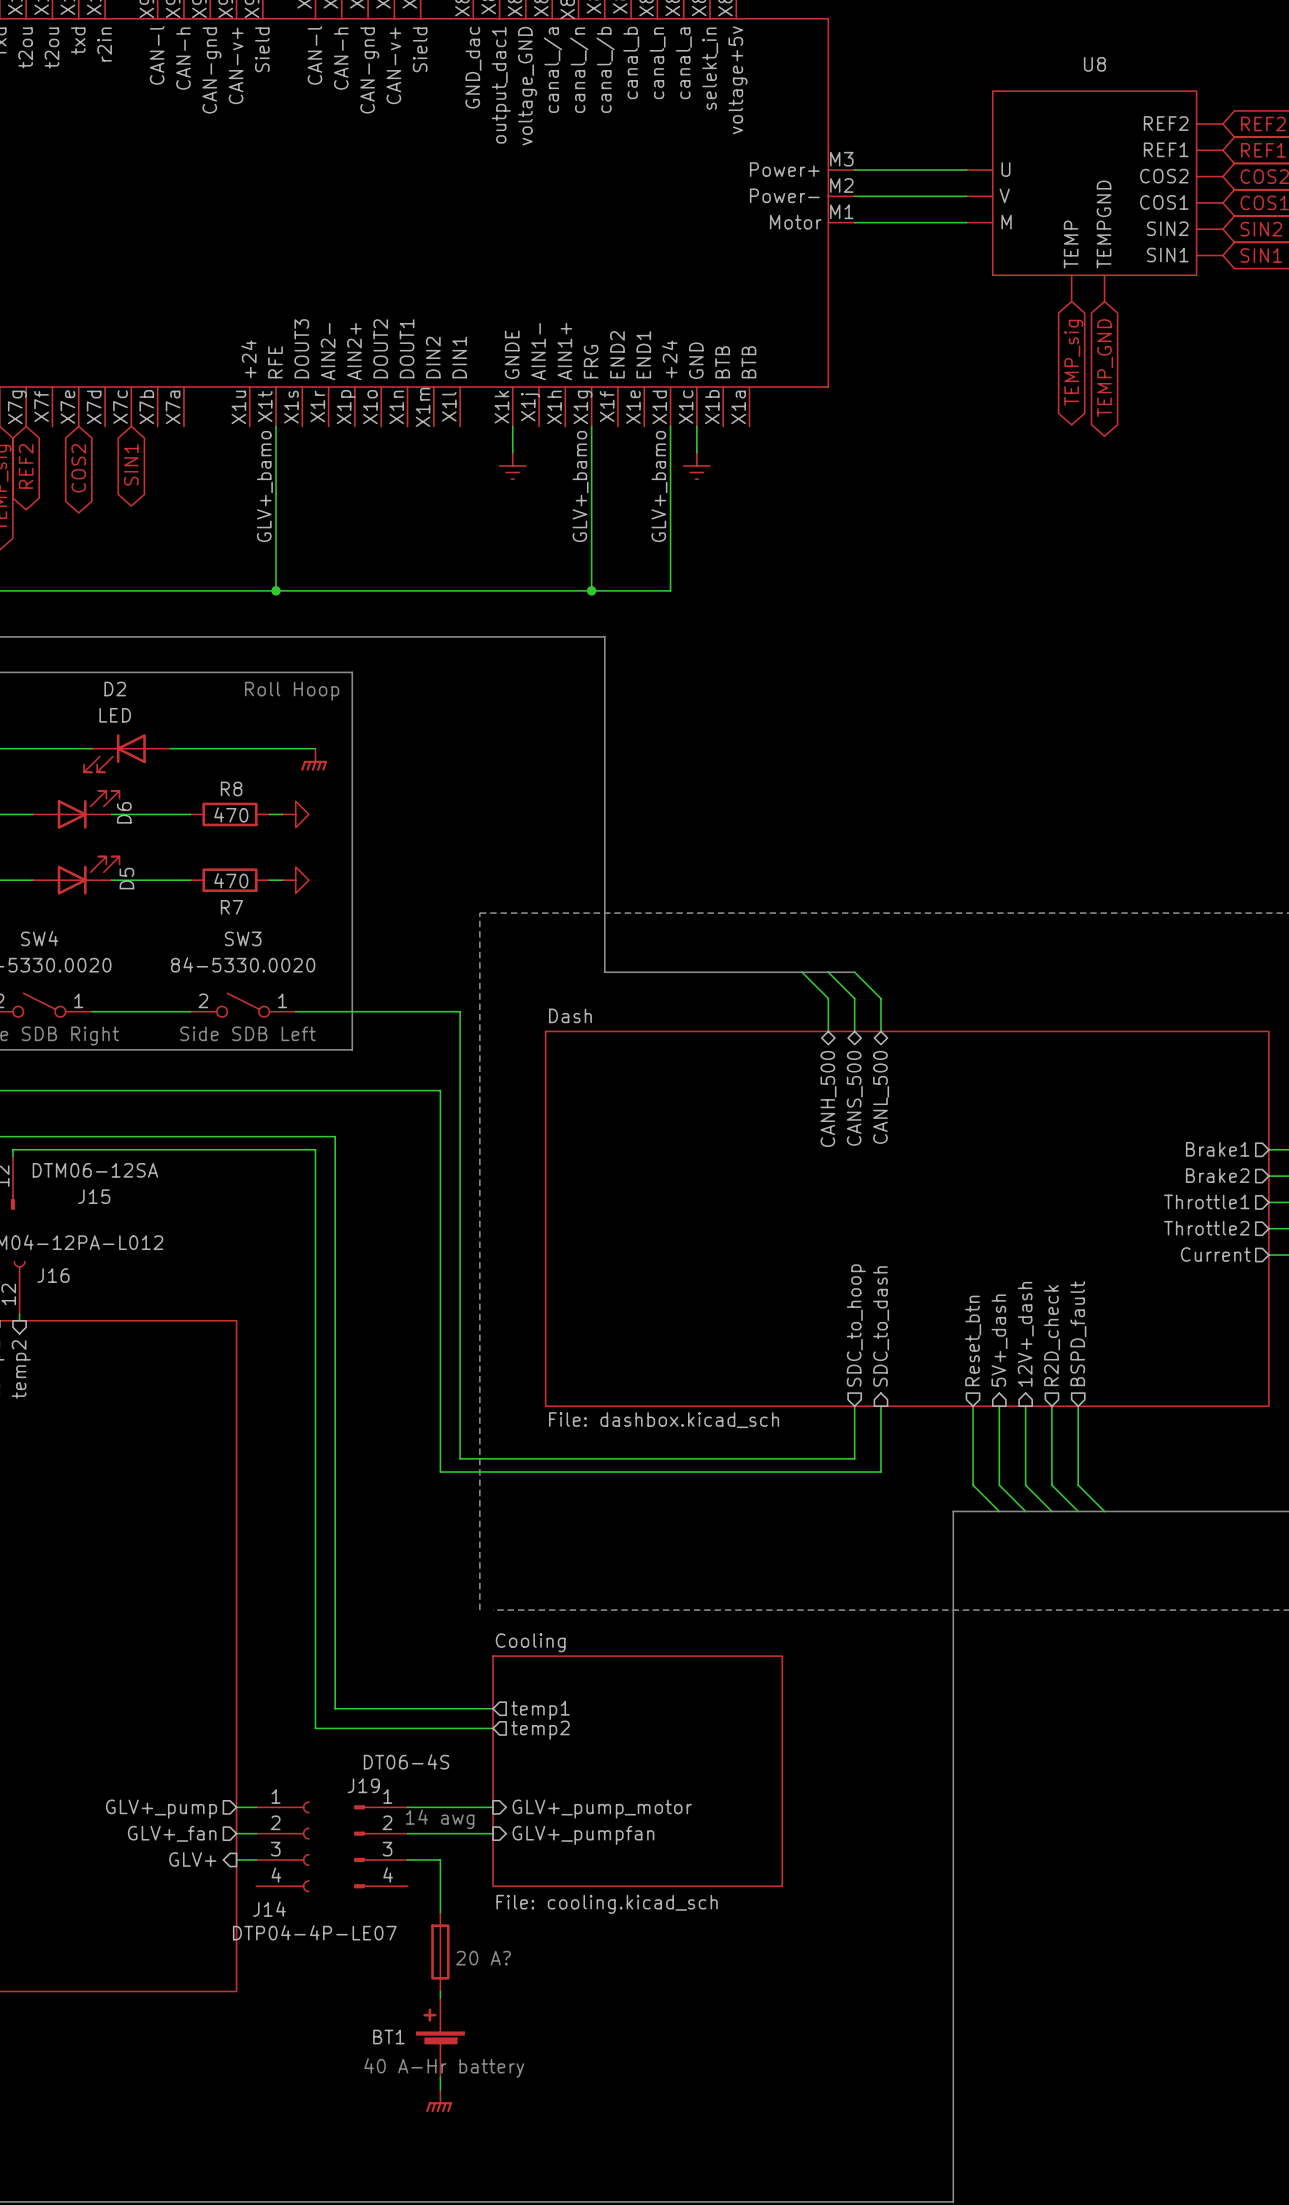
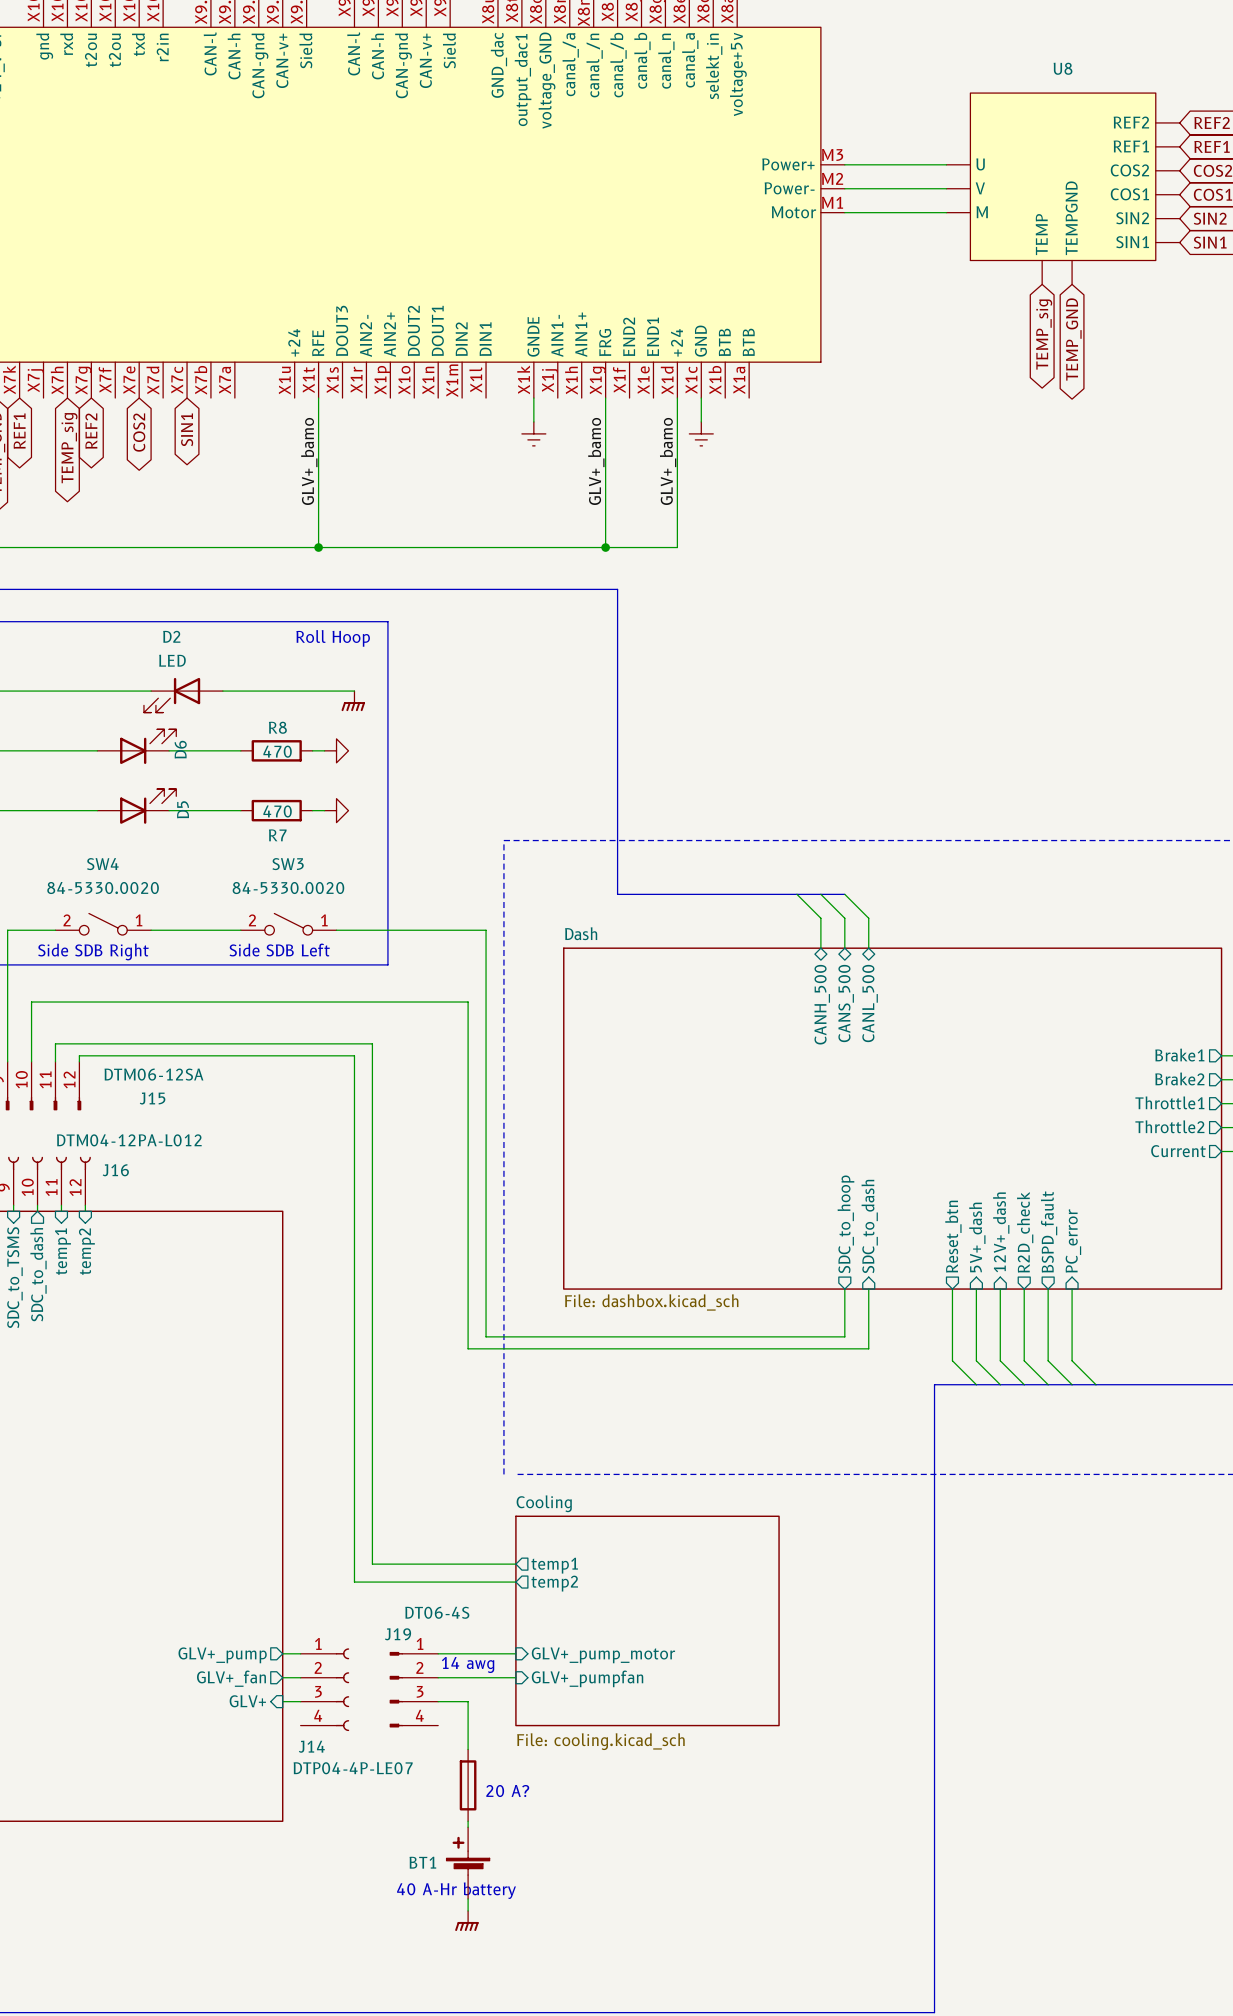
sheet pin: none -> PC_error (1073, 1240)
wire: none -> (1072, 1289) (1072, 1360) (1095, 1384)

